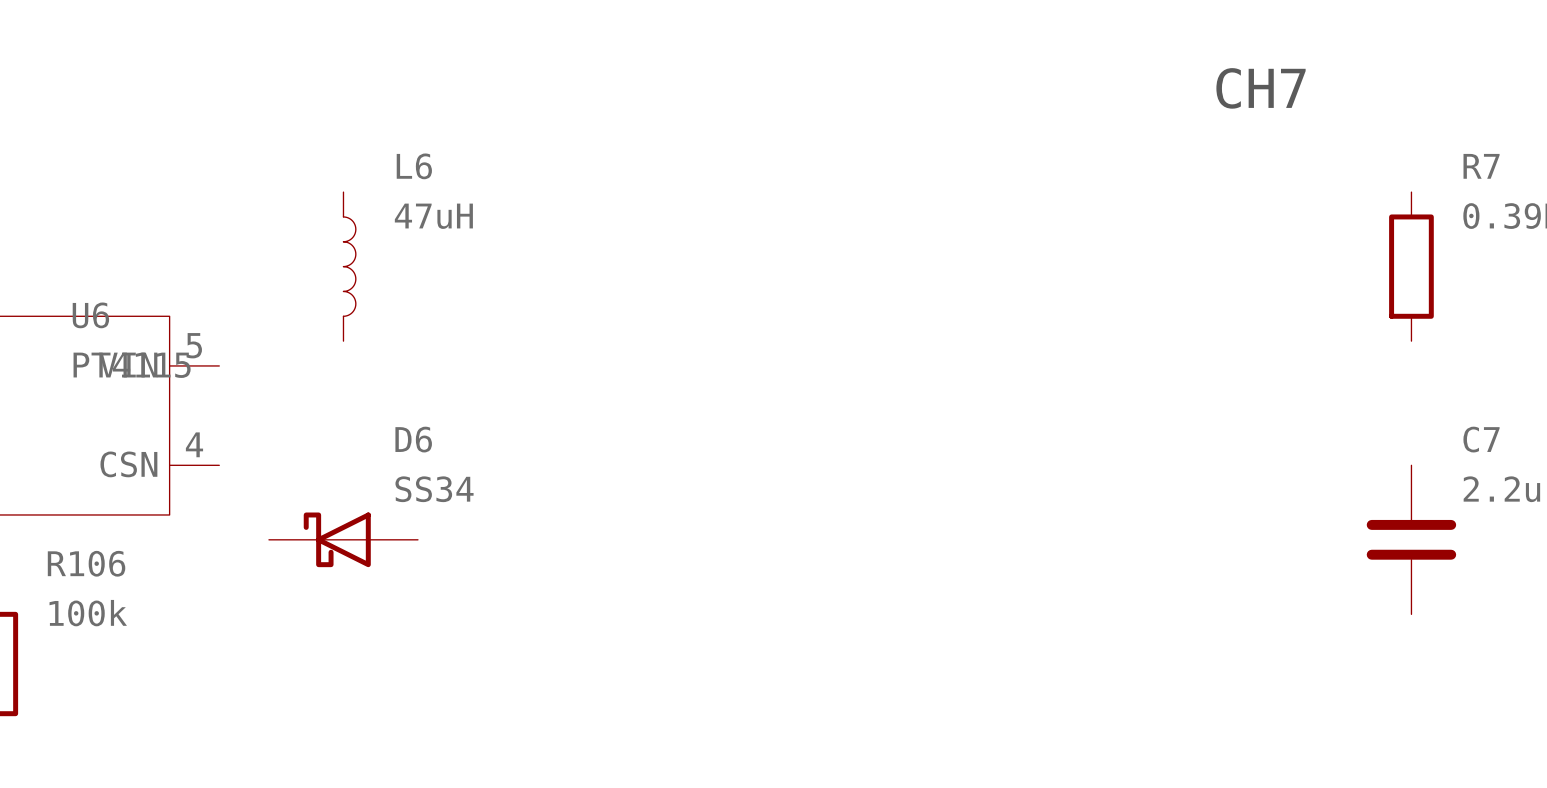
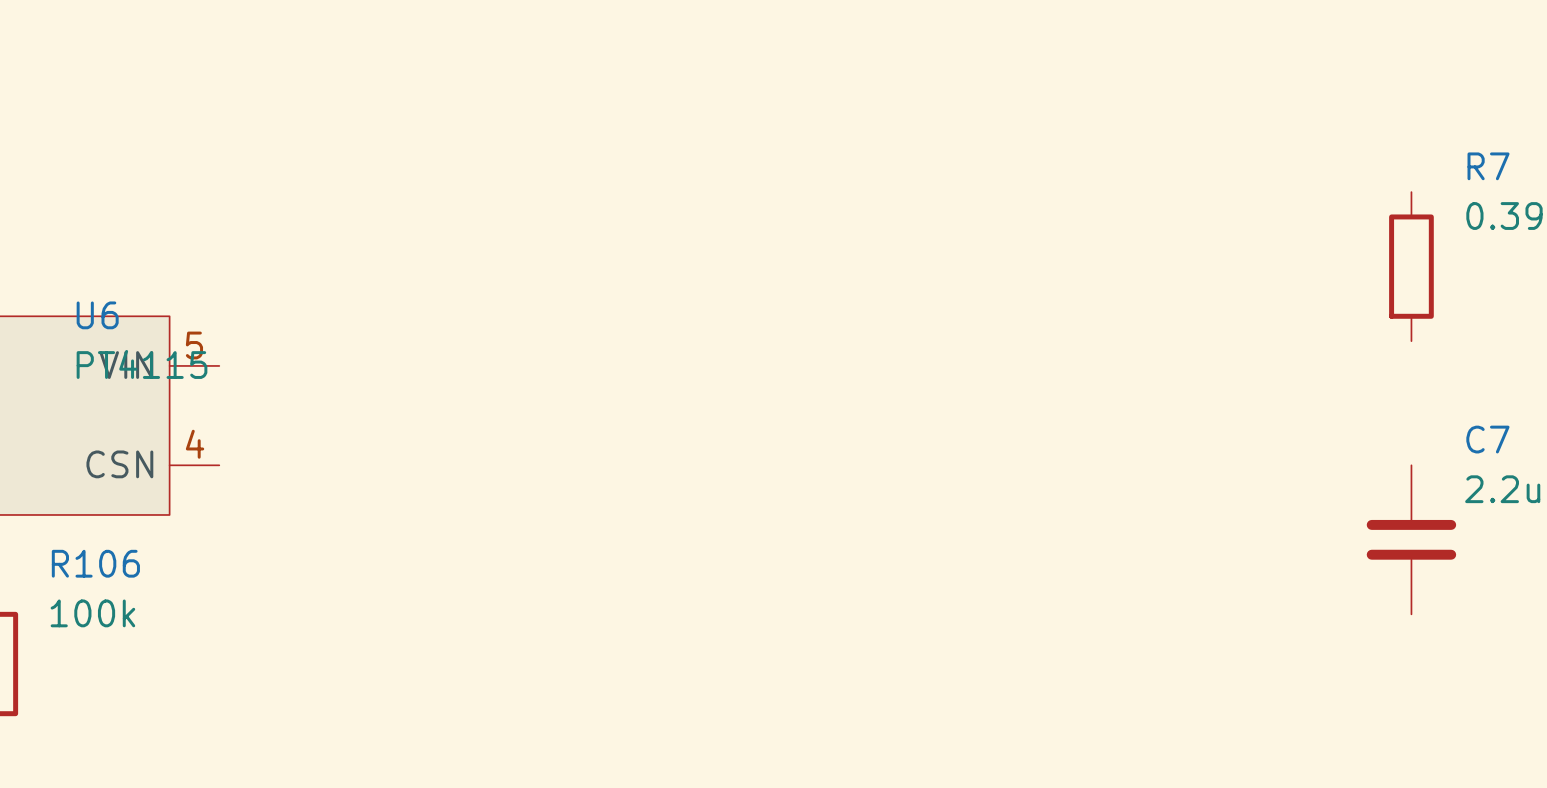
text: CH7 (1261, 88) -> none
L6: 47uH (349, 266) -> none
D6: SS34 (343, 539) -> none

